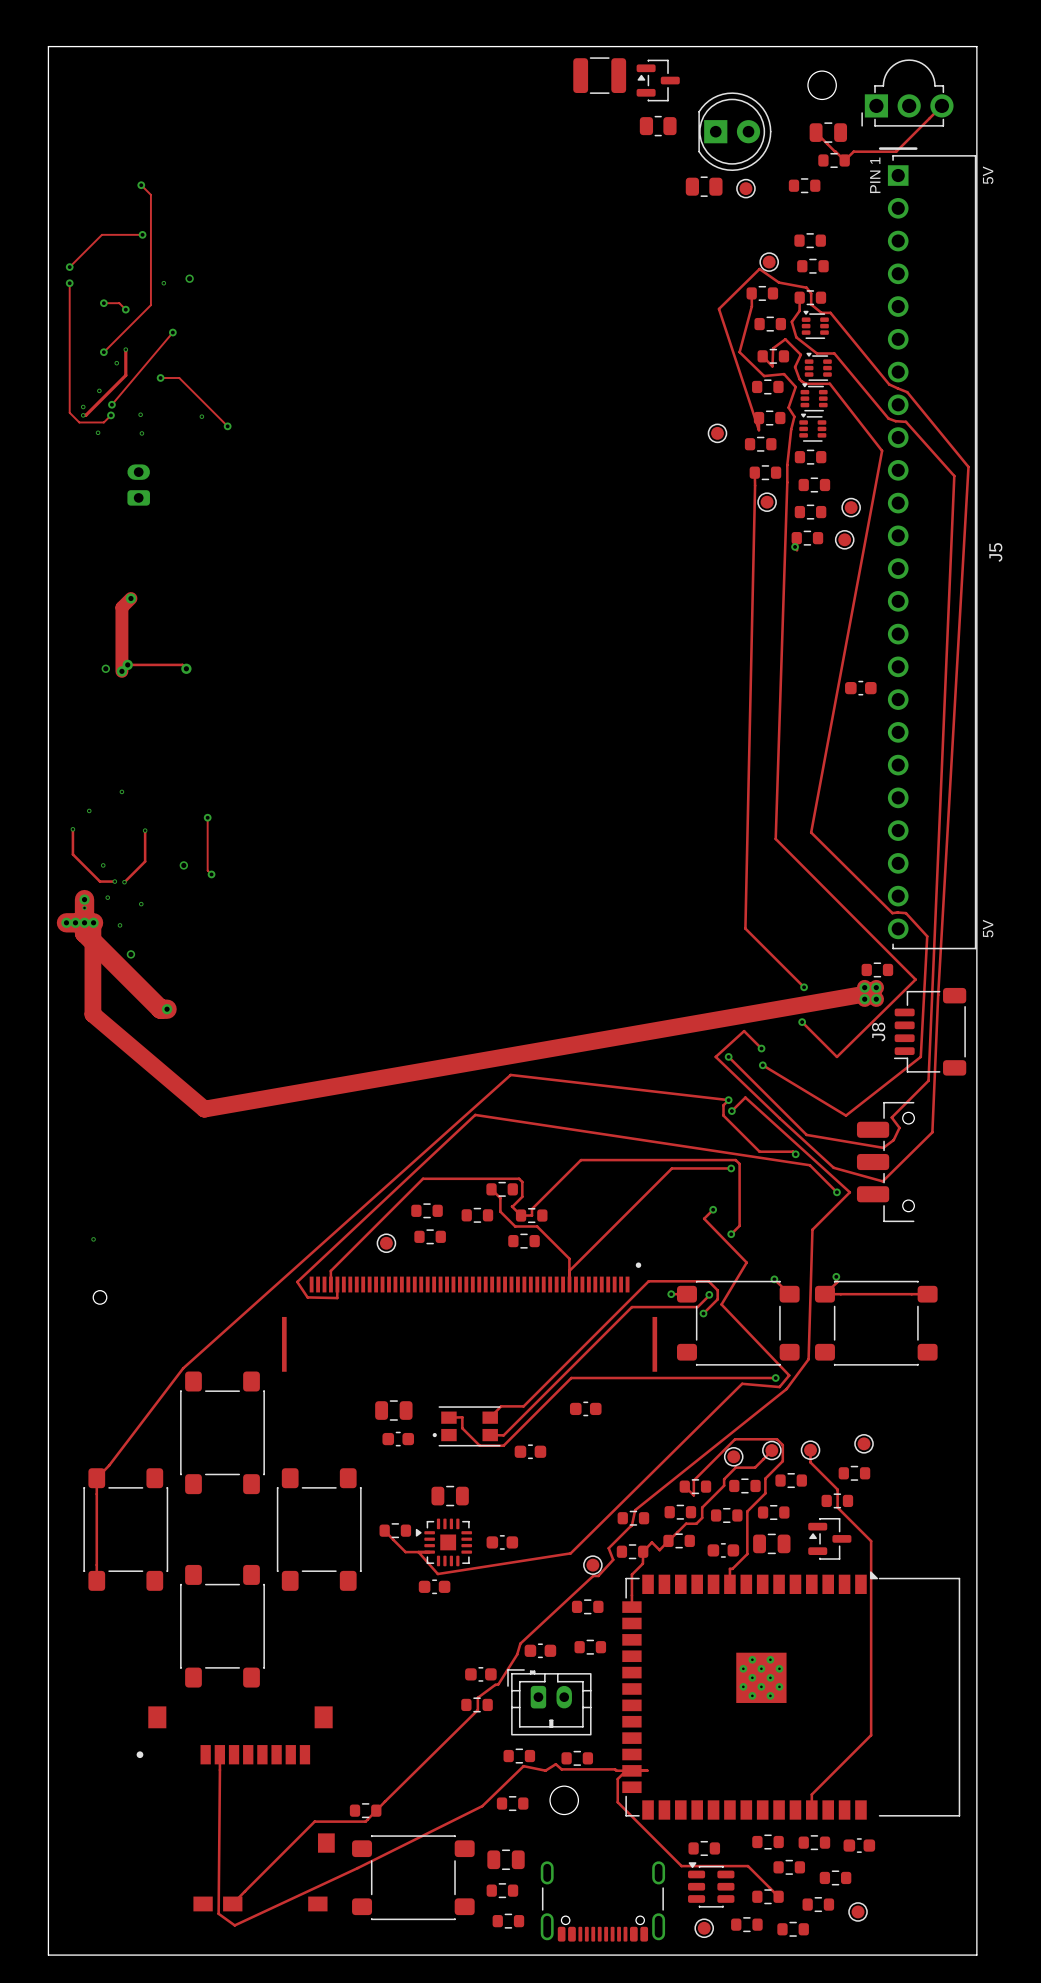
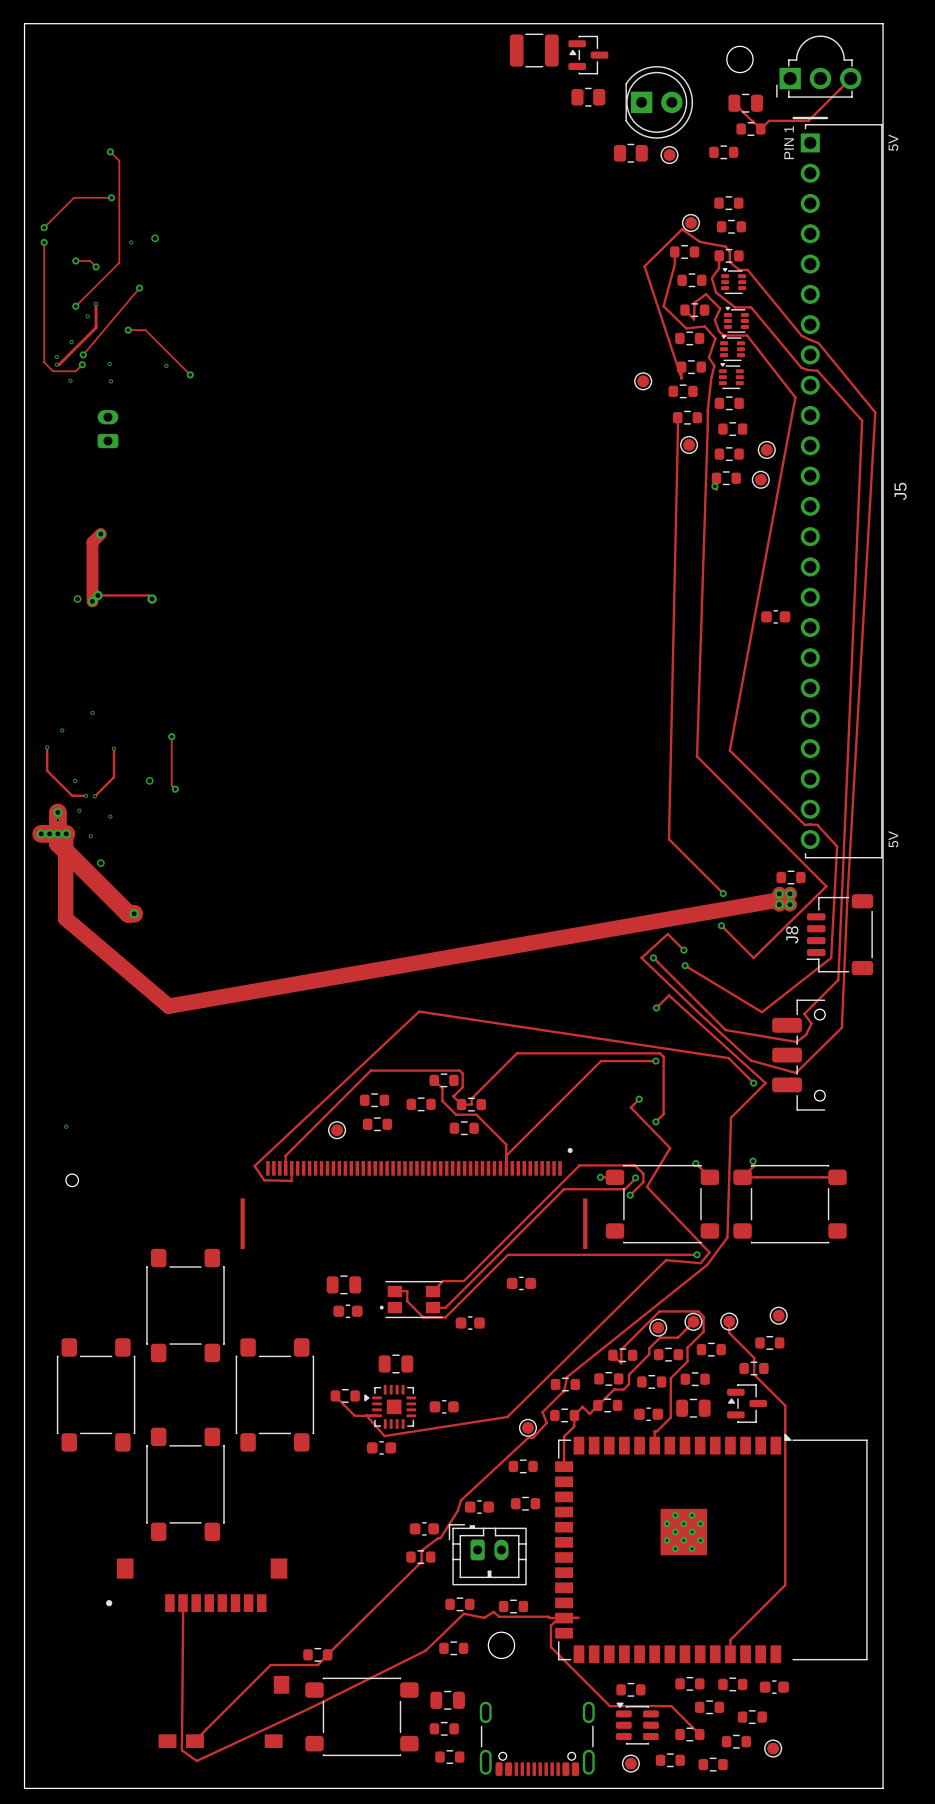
via: (728, 1100) -> none
track: (795, 1154) (793, 1151) (759, 1151) (723, 1115) (723, 1105) (728, 1100) (510, 1074) (183, 1368) (109, 1465) (96, 1478) (96, 1580) -> none
via: (795, 1154) -> none

